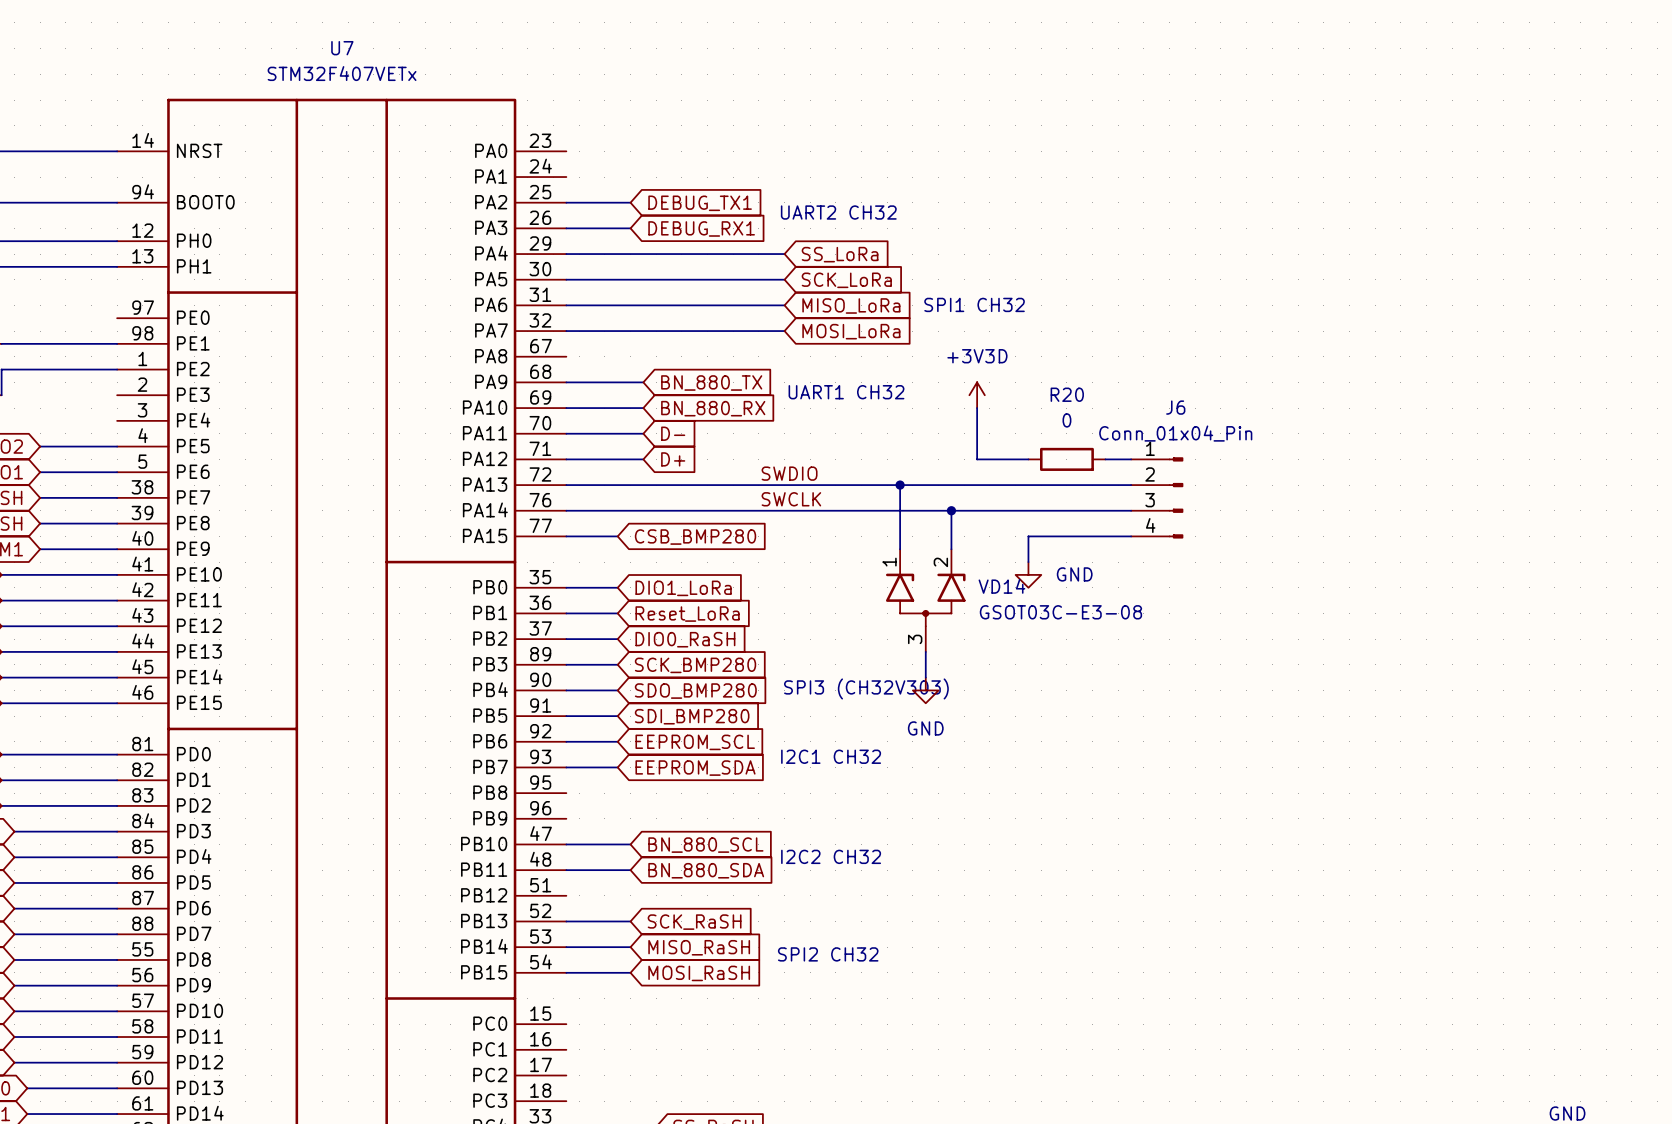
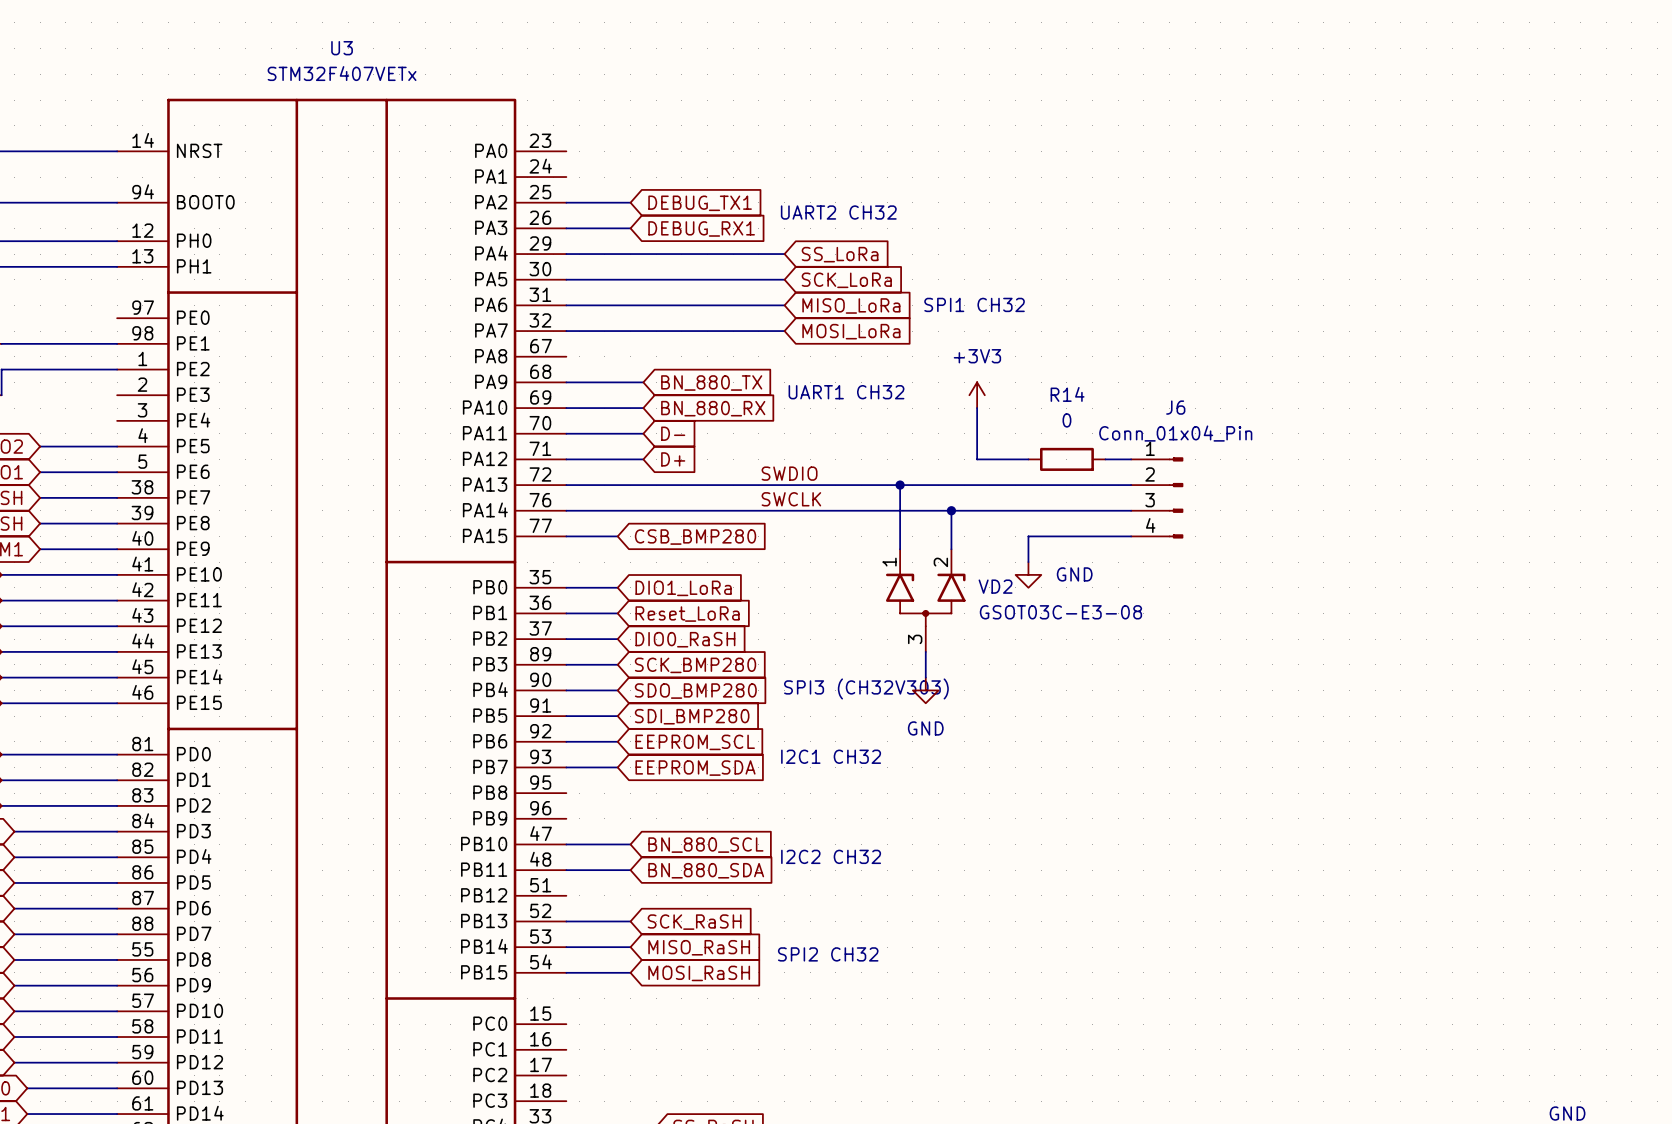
U7 name: U7 (342, 48) -> U3 (342, 48)
R20 name: R20 (1067, 394) -> R14 (1067, 394)
power symbol: +3V3D (977, 395) -> +3V3 (977, 395)
VD14 name: VD14 (1001, 586) -> VD2 (995, 586)

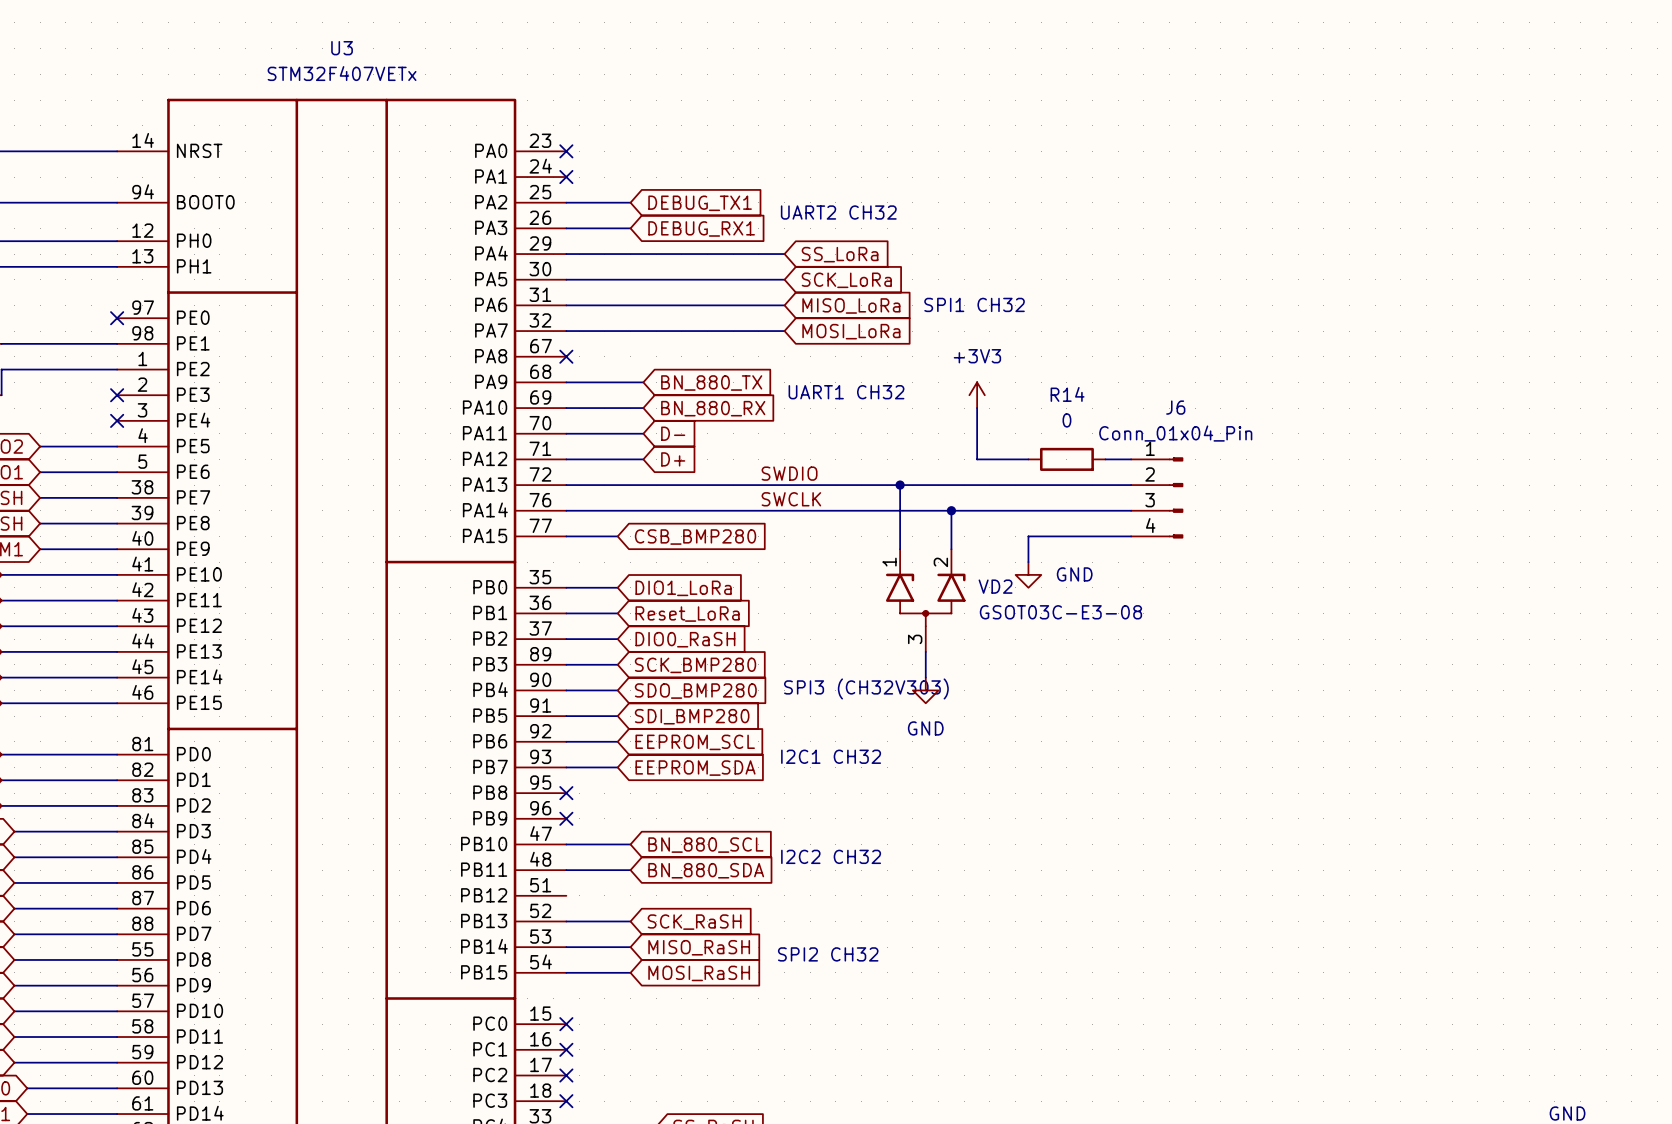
no-connect mark: none -> (566, 151)
no-connect mark: none -> (566, 177)
no-connect mark: none -> (117, 318)
no-connect mark: none -> (566, 356)
no-connect mark: none -> (117, 395)
no-connect mark: none -> (117, 420)
no-connect mark: none -> (566, 793)
no-connect mark: none -> (566, 818)
no-connect mark: none -> (566, 1024)
no-connect mark: none -> (566, 1049)
no-connect mark: none -> (566, 1075)
no-connect mark: none -> (566, 1101)

